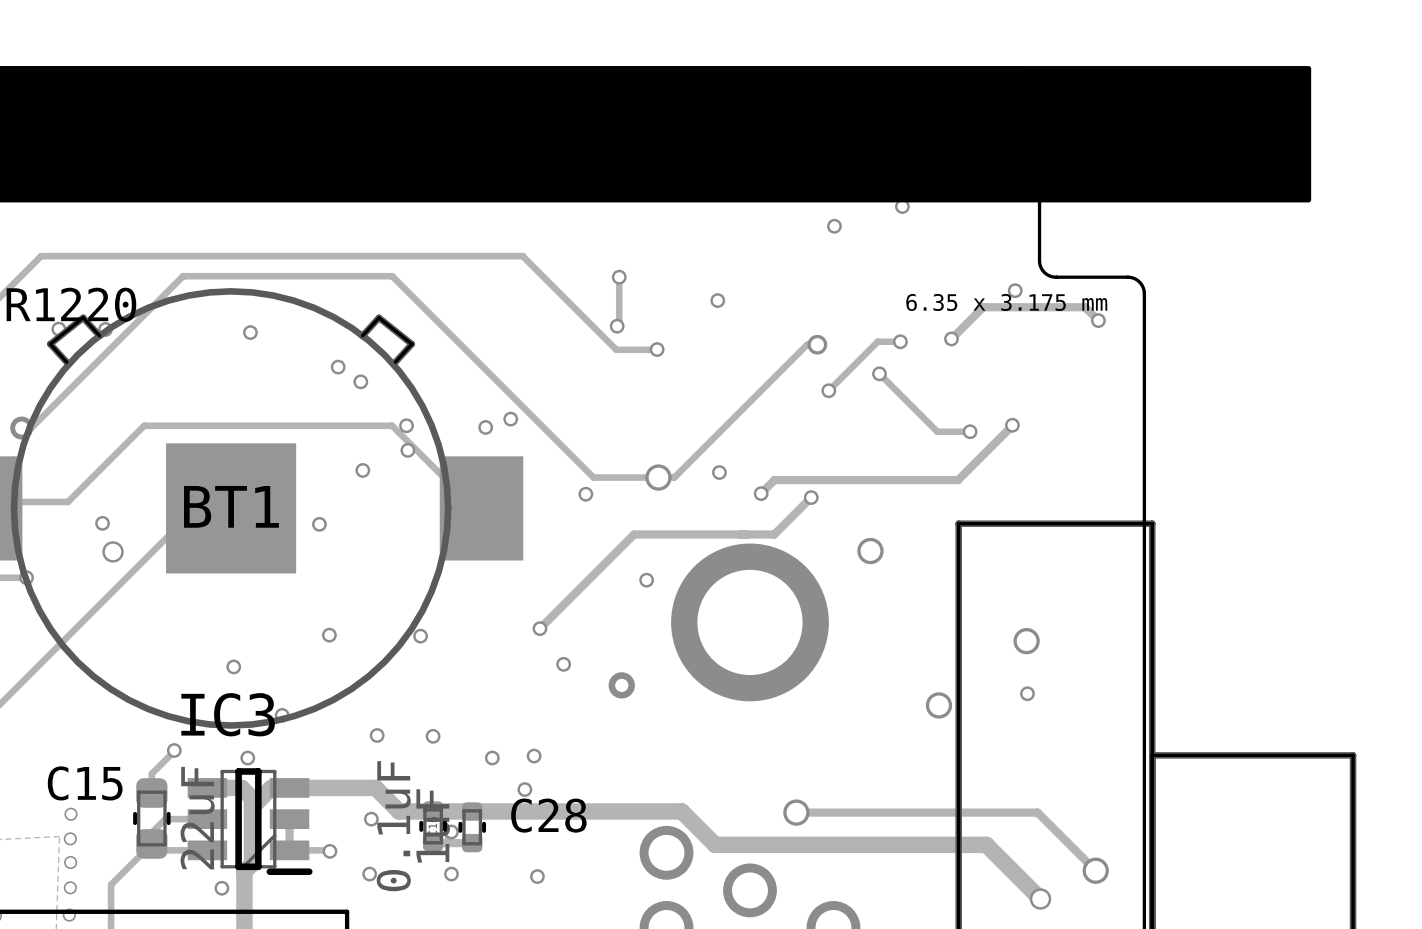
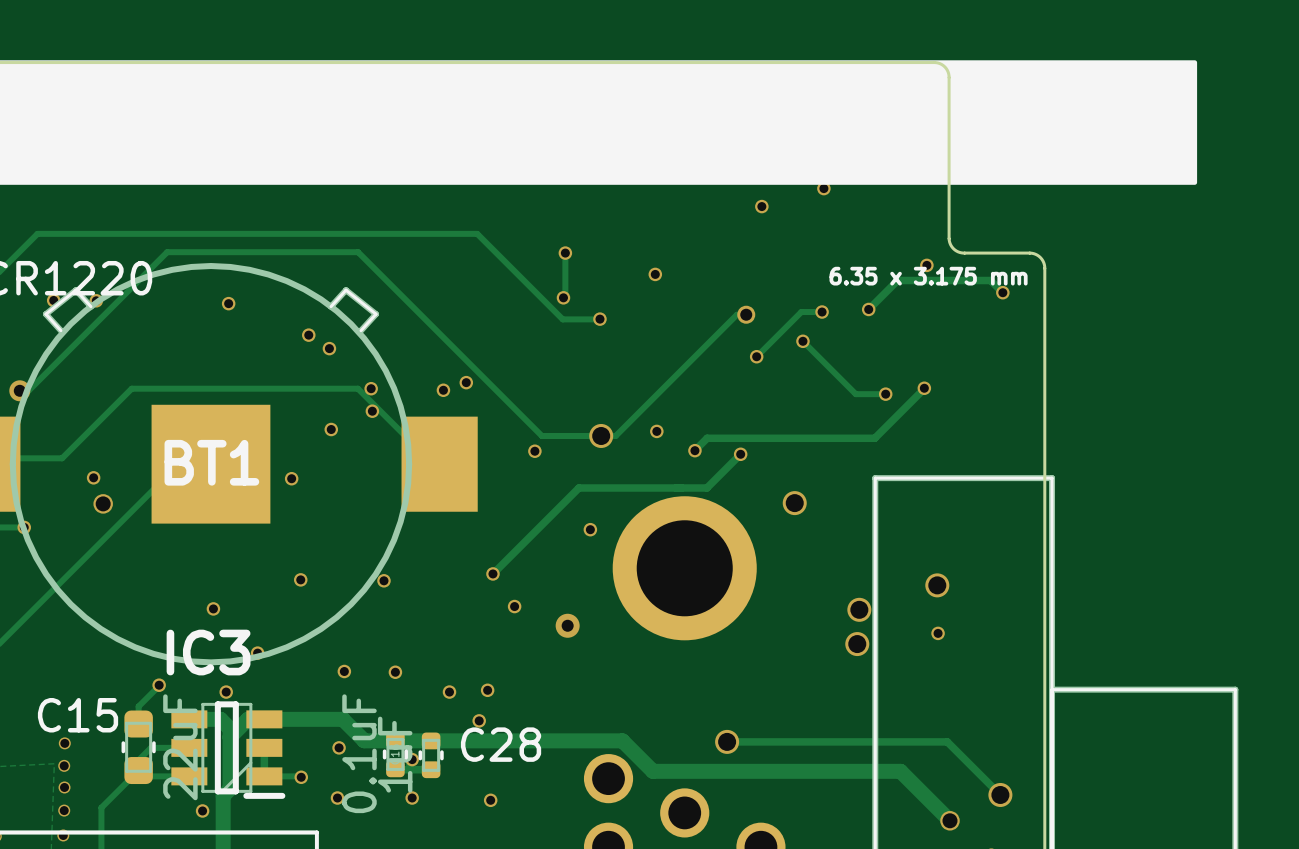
via: none -> (859, 609)

